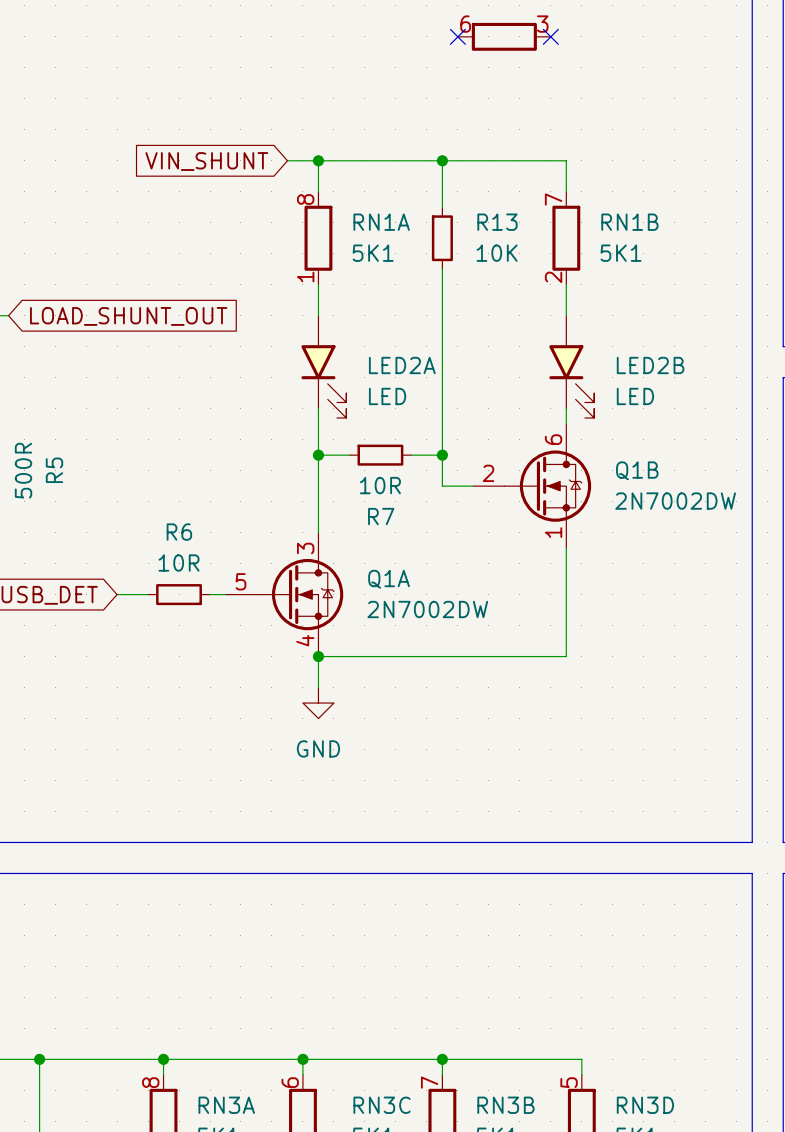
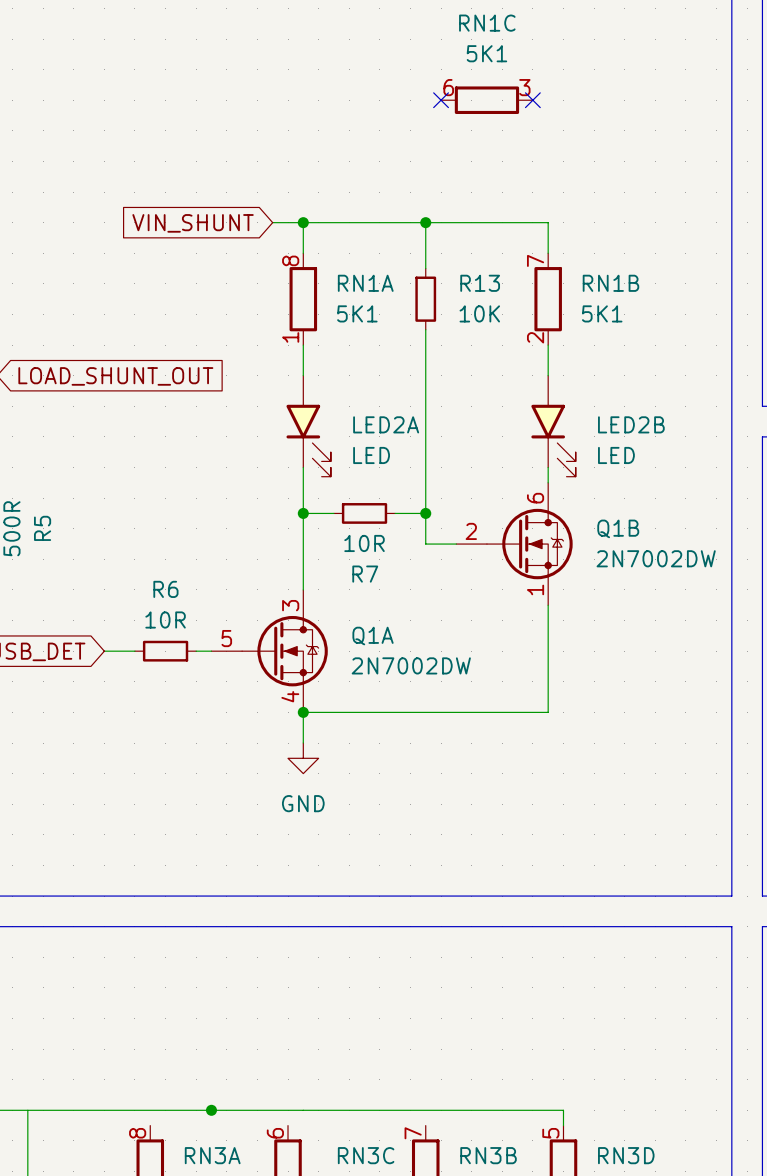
junction: (39, 1059) -> none
wire: (163, 1059) (163, 1074) -> none
junction: (163, 1059) -> none
junction: none -> (211, 1110)
wire: (302, 1059) (302, 1074) -> none
junction: (302, 1059) -> none
wire: (442, 1059) (442, 1074) -> none
junction: (442, 1059) -> none

